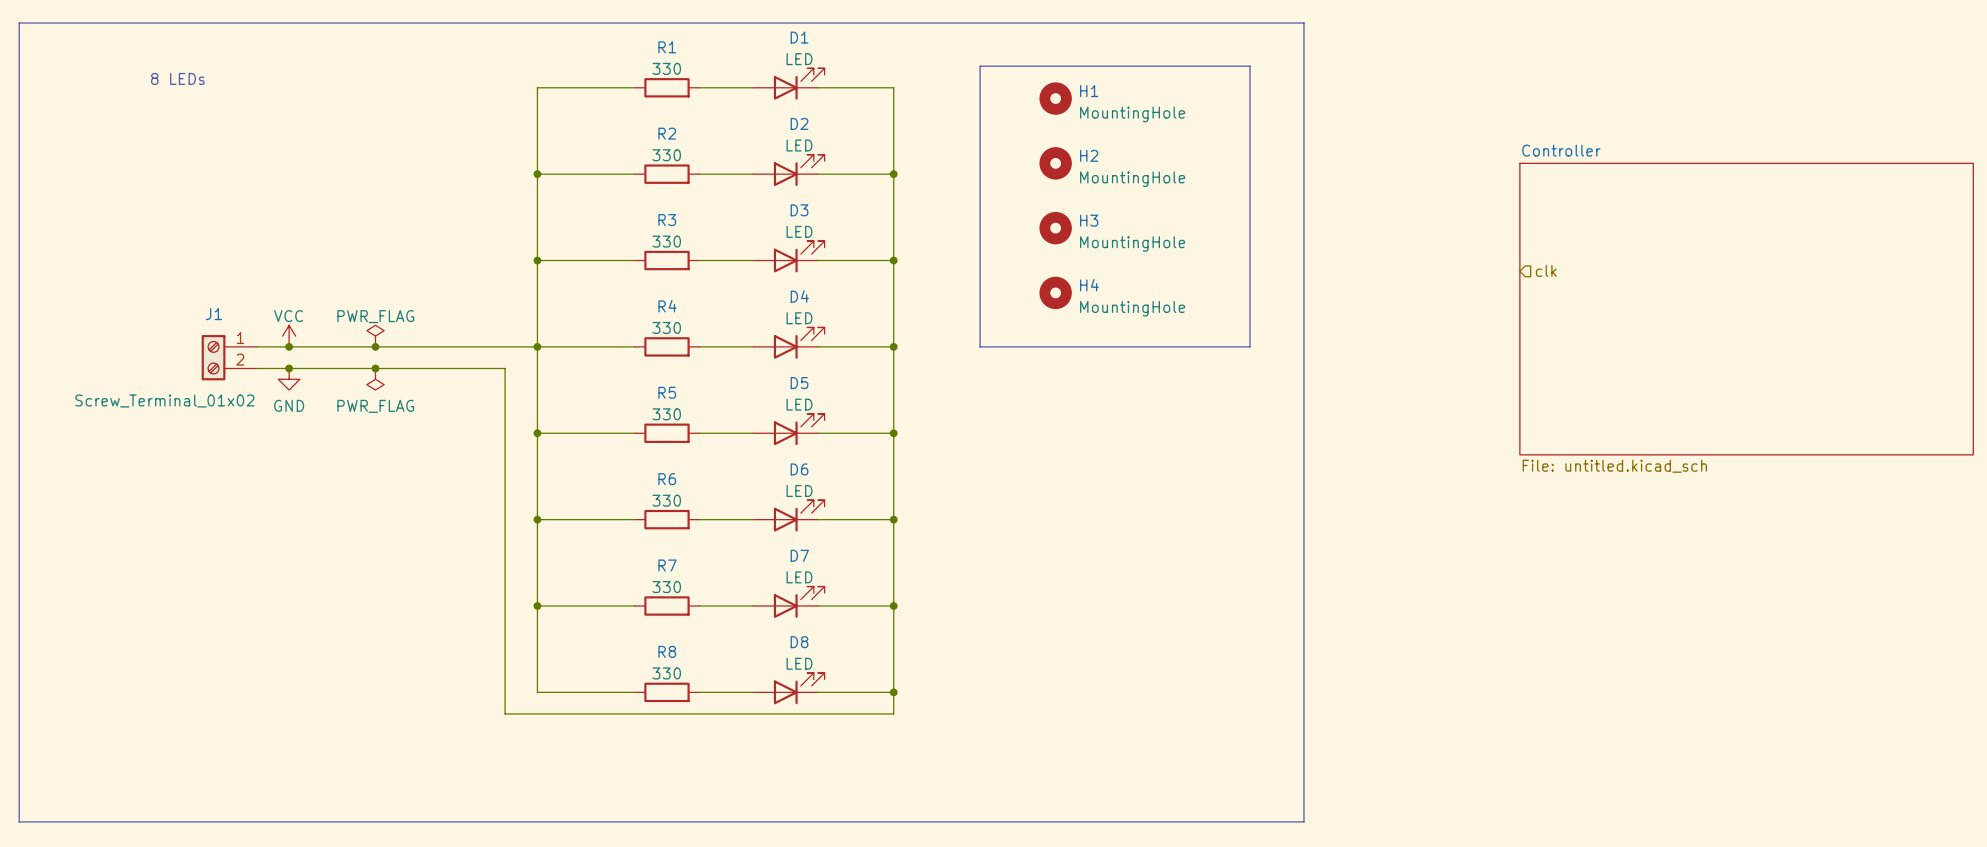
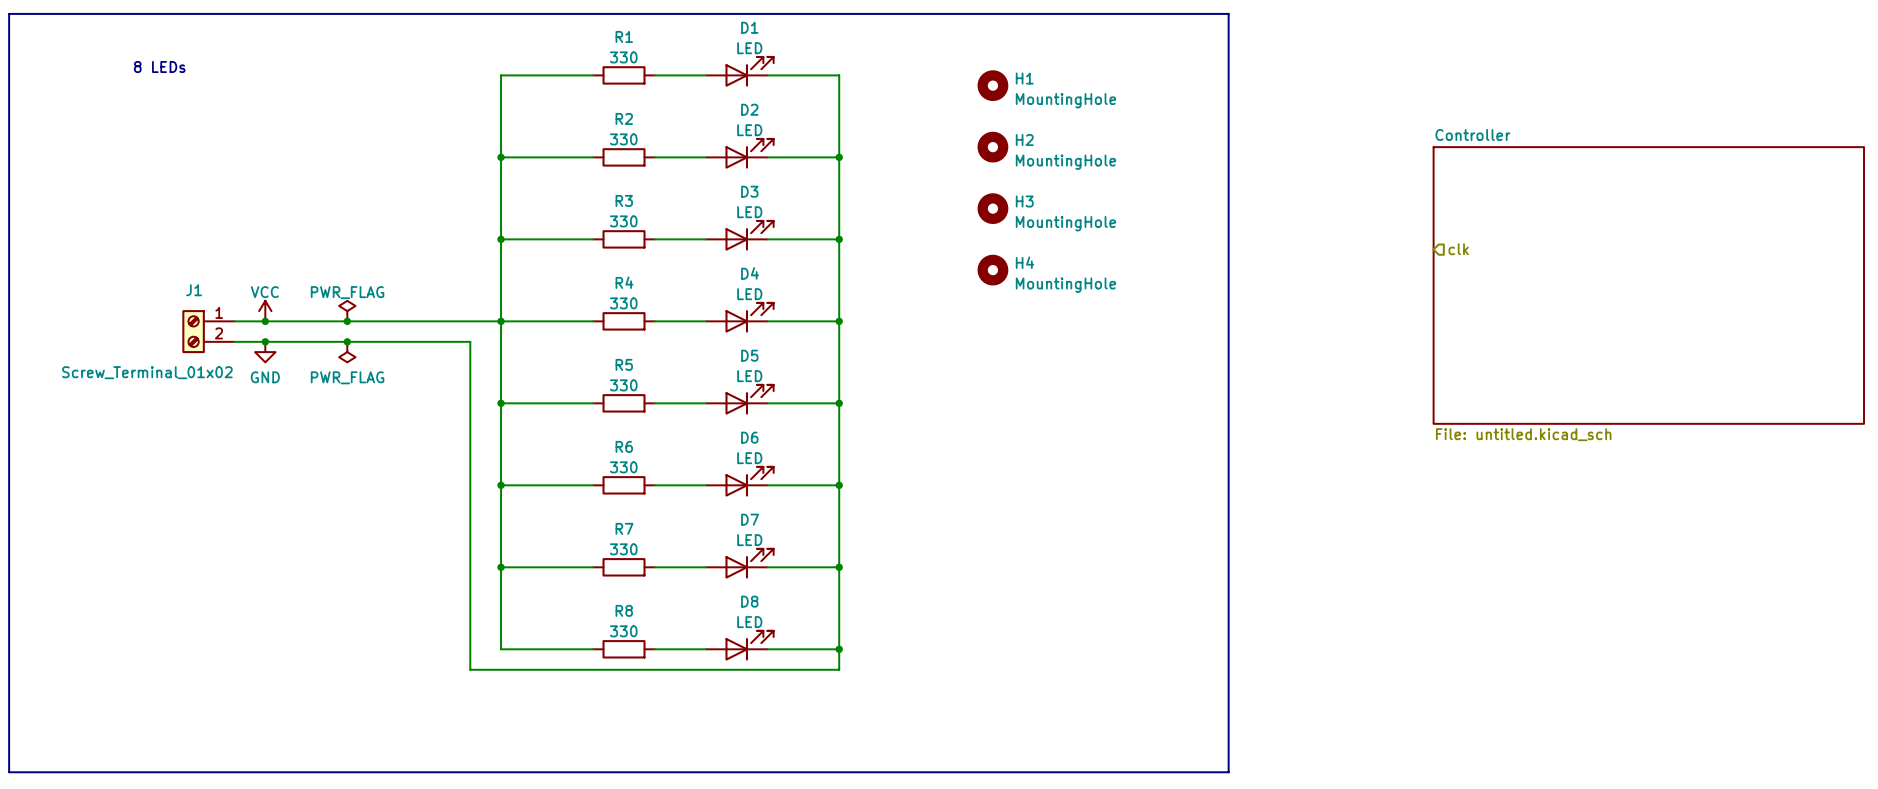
line: (980, 66) (1249, 66) (1249, 346) (980, 346) (980, 66) -> none

